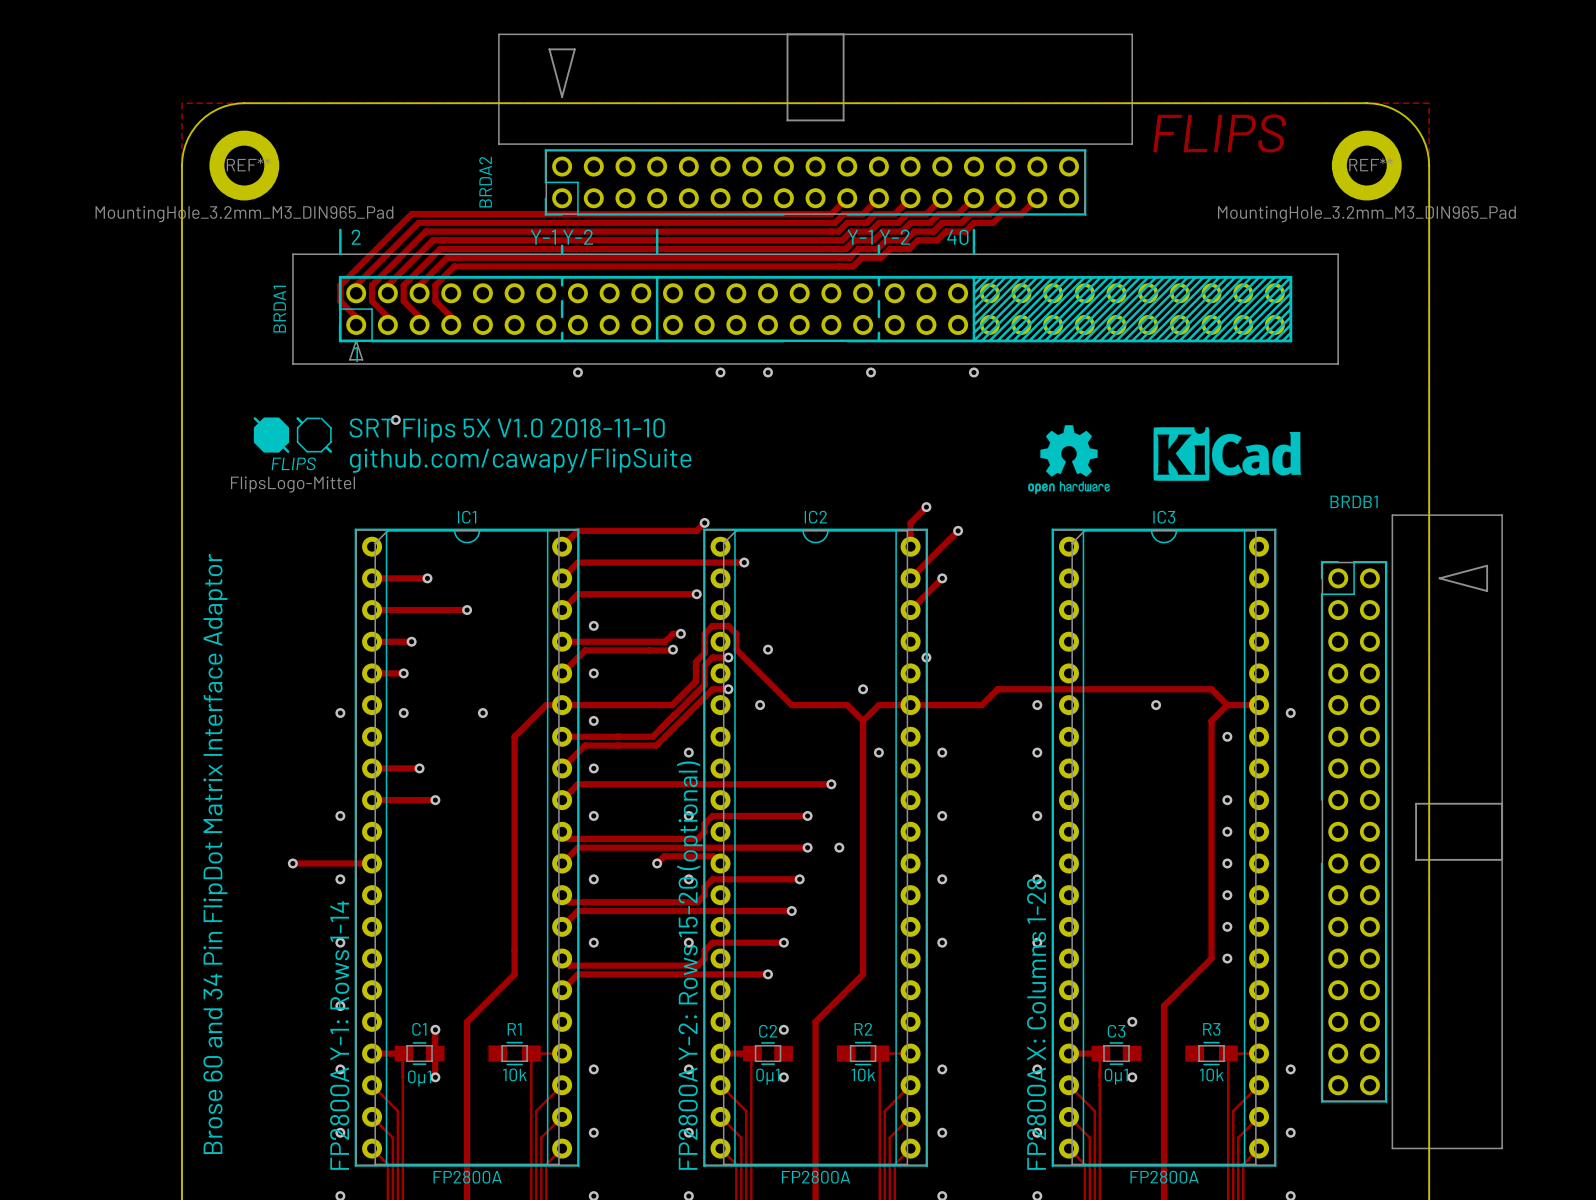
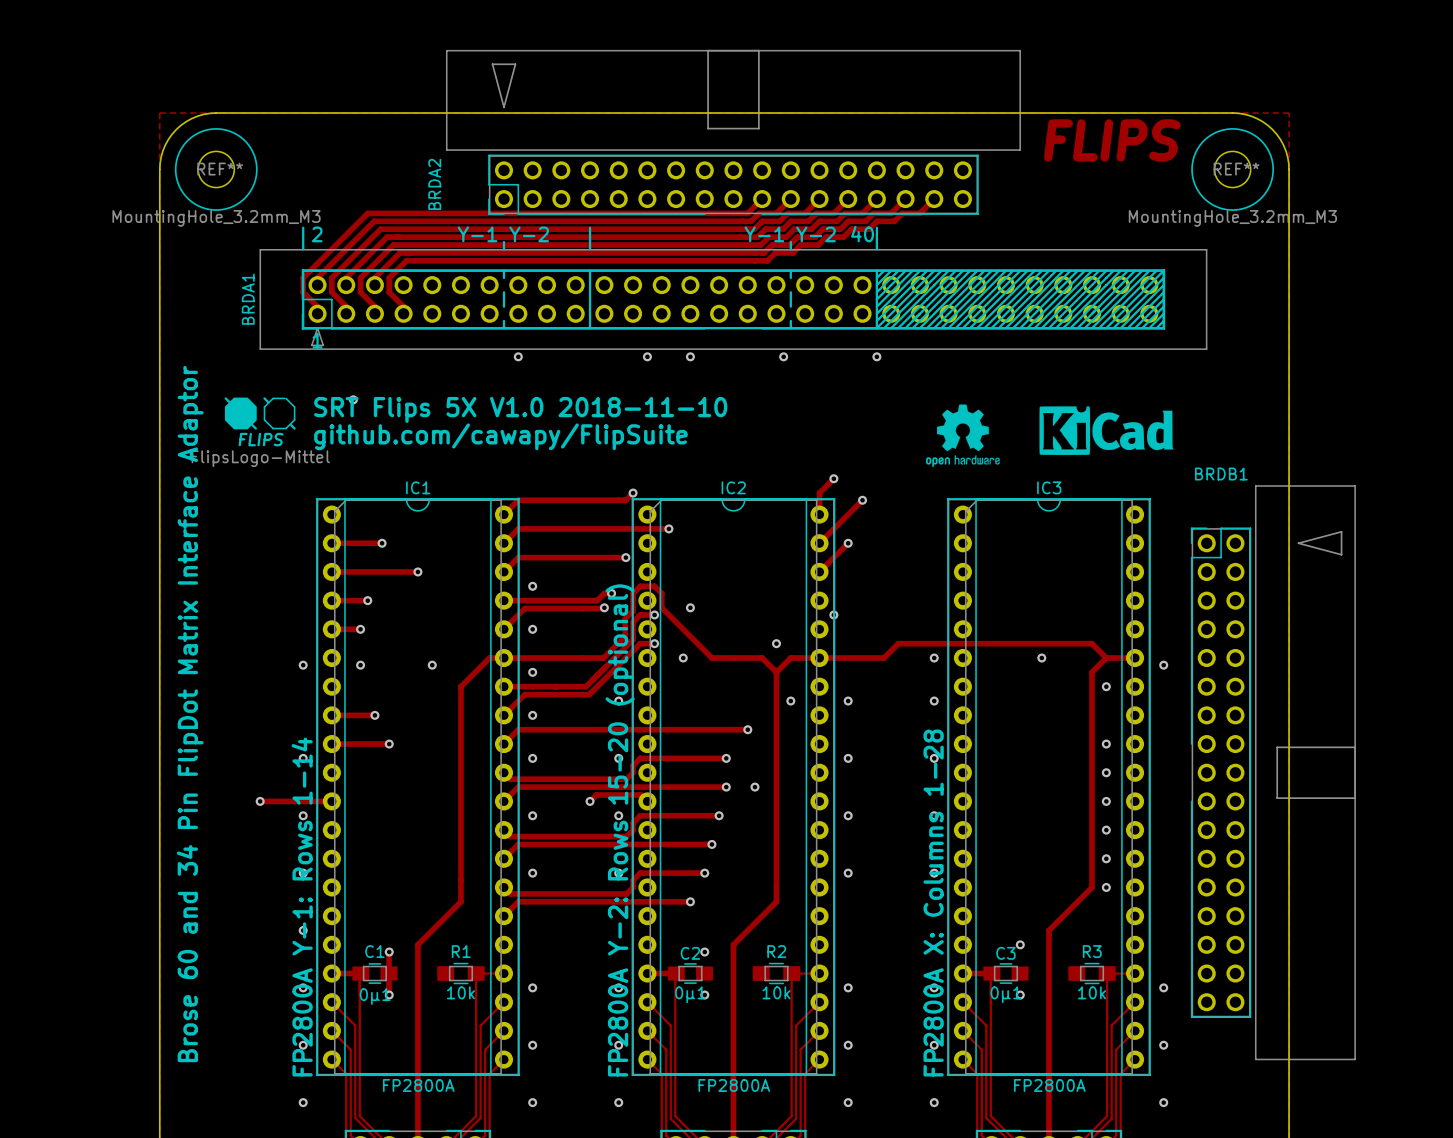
REF** footprint: [209, 130, 280, 201] -> [174, 128, 258, 211]
REF** footprint: [1331, 130, 1402, 201] -> [1191, 128, 1275, 211]
REF** value: MountingHole_3.2mm_M3_DIN965_Pad (244, 214) -> MountingHole_3.2mm_M3 (216, 218)
REF** value: MountingHole_3.2mm_M3_DIN965_Pad (1366, 214) -> MountingHole_3.2mm_M3 (1232, 218)

